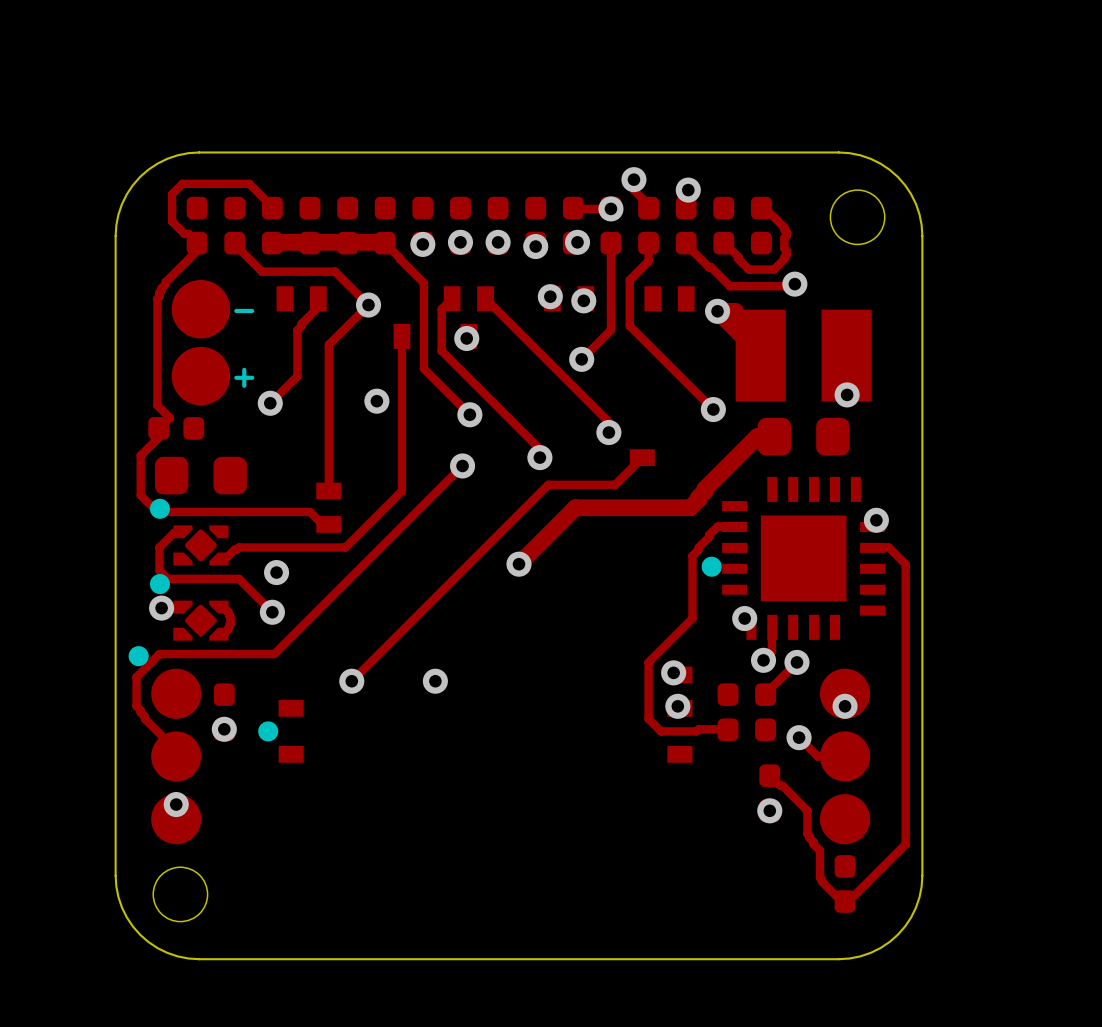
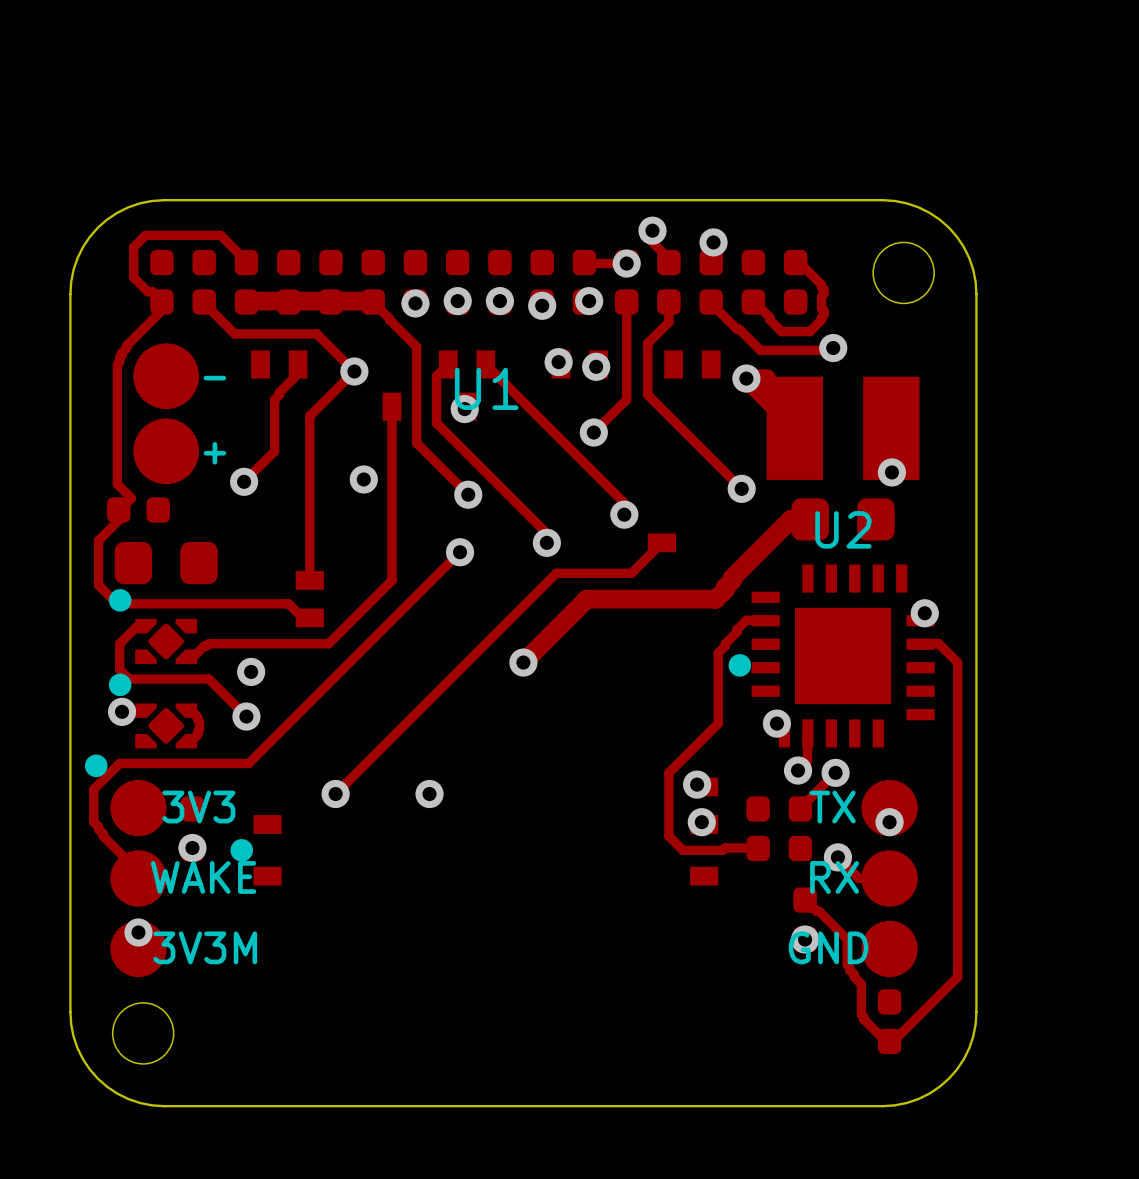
text: none -> U1 (486, 388)
text: none -> U2 (843, 529)
text: none -> 3V3 (198, 807)
text: none -> TX (832, 807)
text: none -> WAKE (203, 877)
text: none -> RX (834, 877)
text: none -> 3V3M (205, 947)
text: none -> GND (828, 947)

